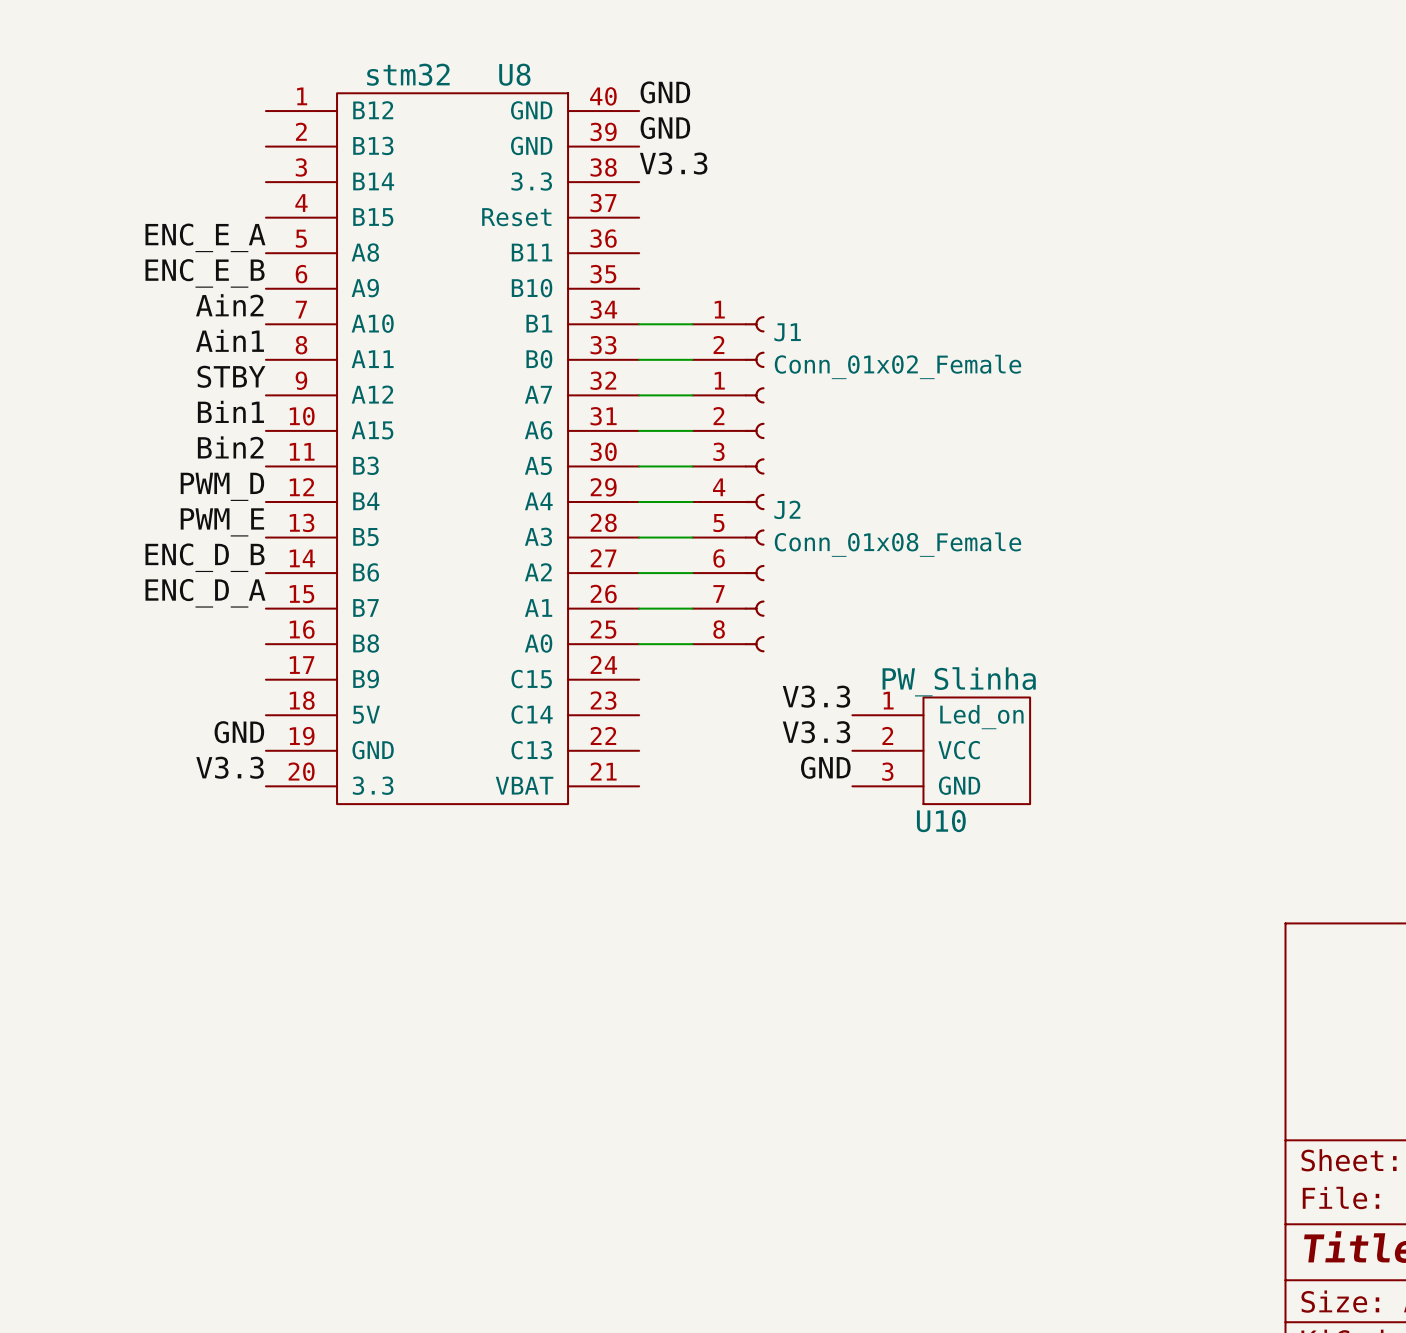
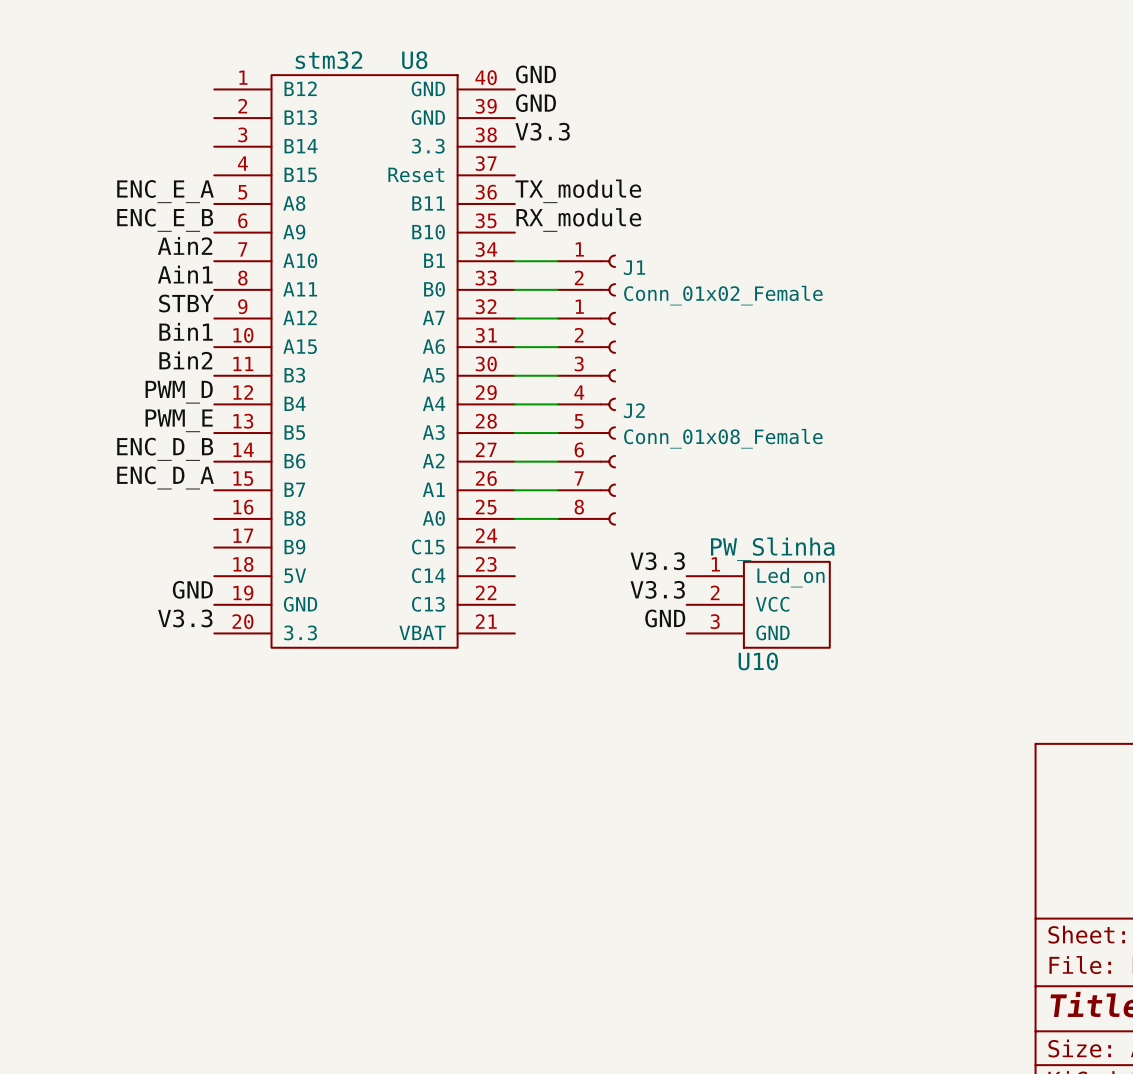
label: none -> TX_module (578, 191)
label: none -> RX_module (578, 219)

